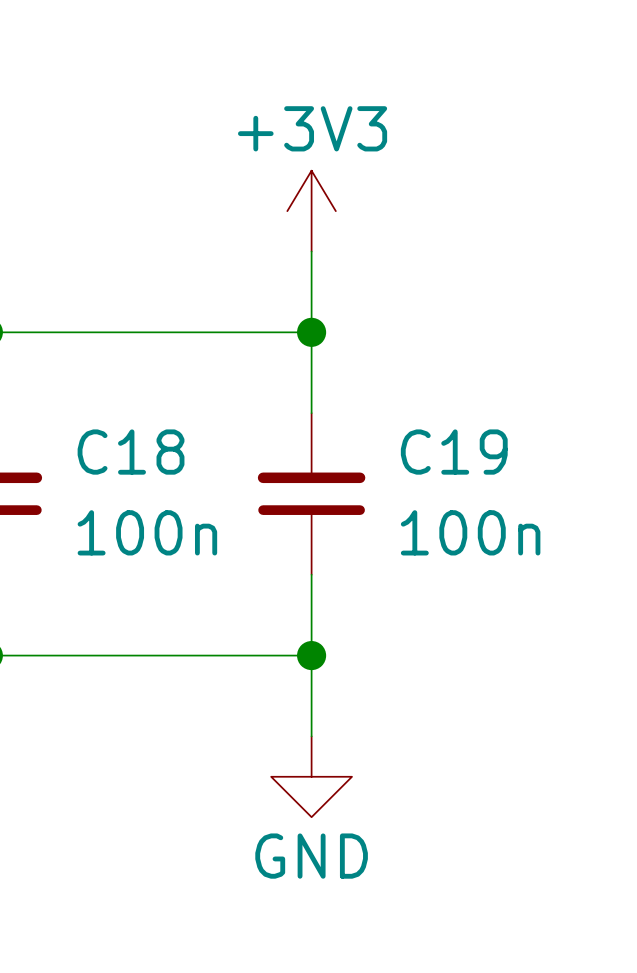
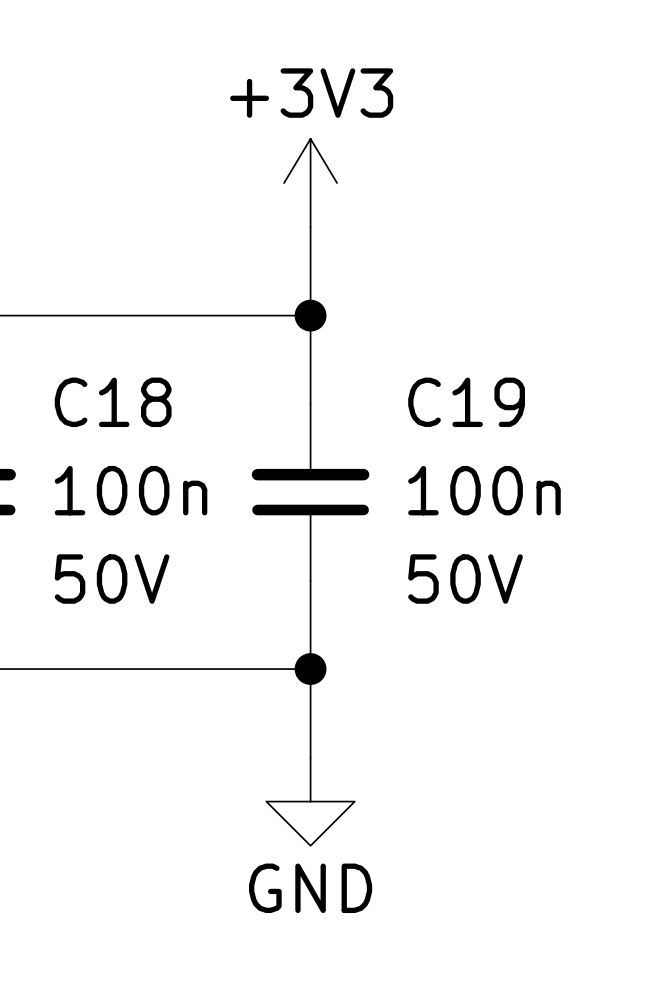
C18 name position: C18 (131, 452) -> C18 (113, 402)
C19 name position: C19 (454, 452) -> C19 (466, 402)
C18 value position: 100n (147, 532) -> 100n (131, 490)
C19 value position: 100n (470, 532) -> 100n (484, 490)
C18 text: none -> 50V (112, 579)
C19 text: none -> 50V (465, 579)

